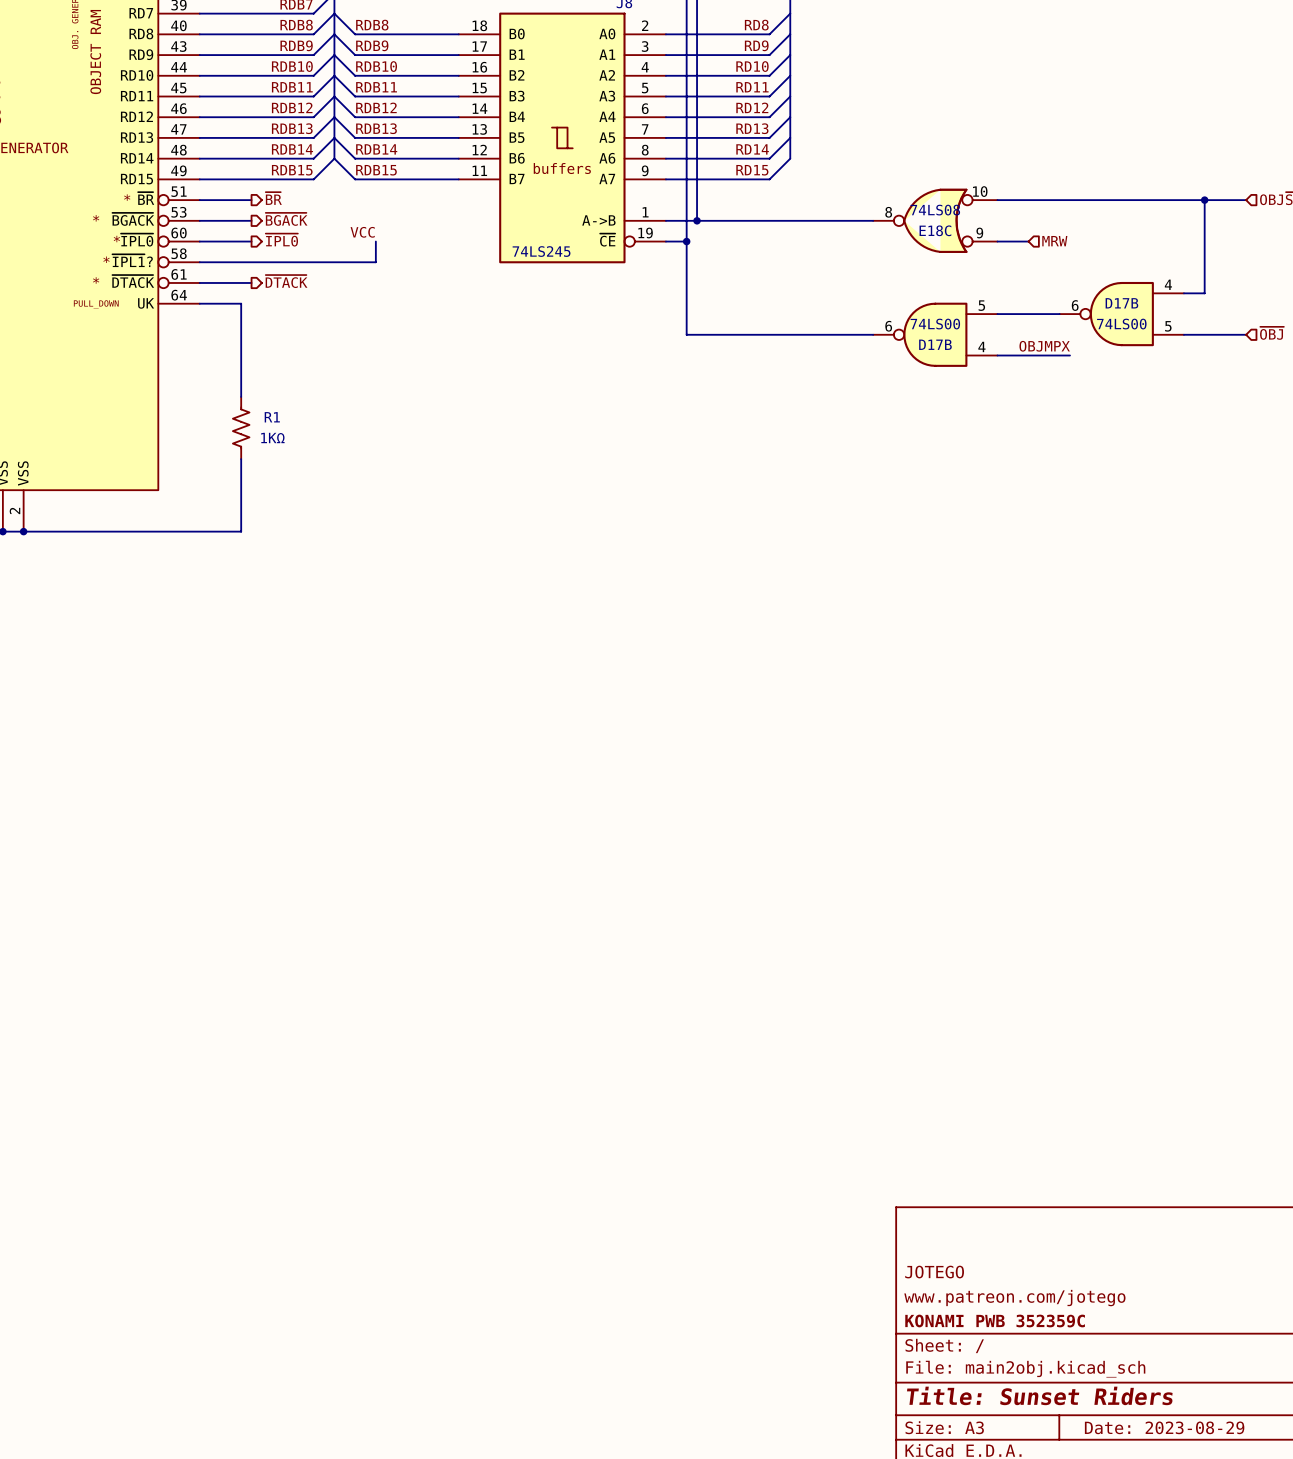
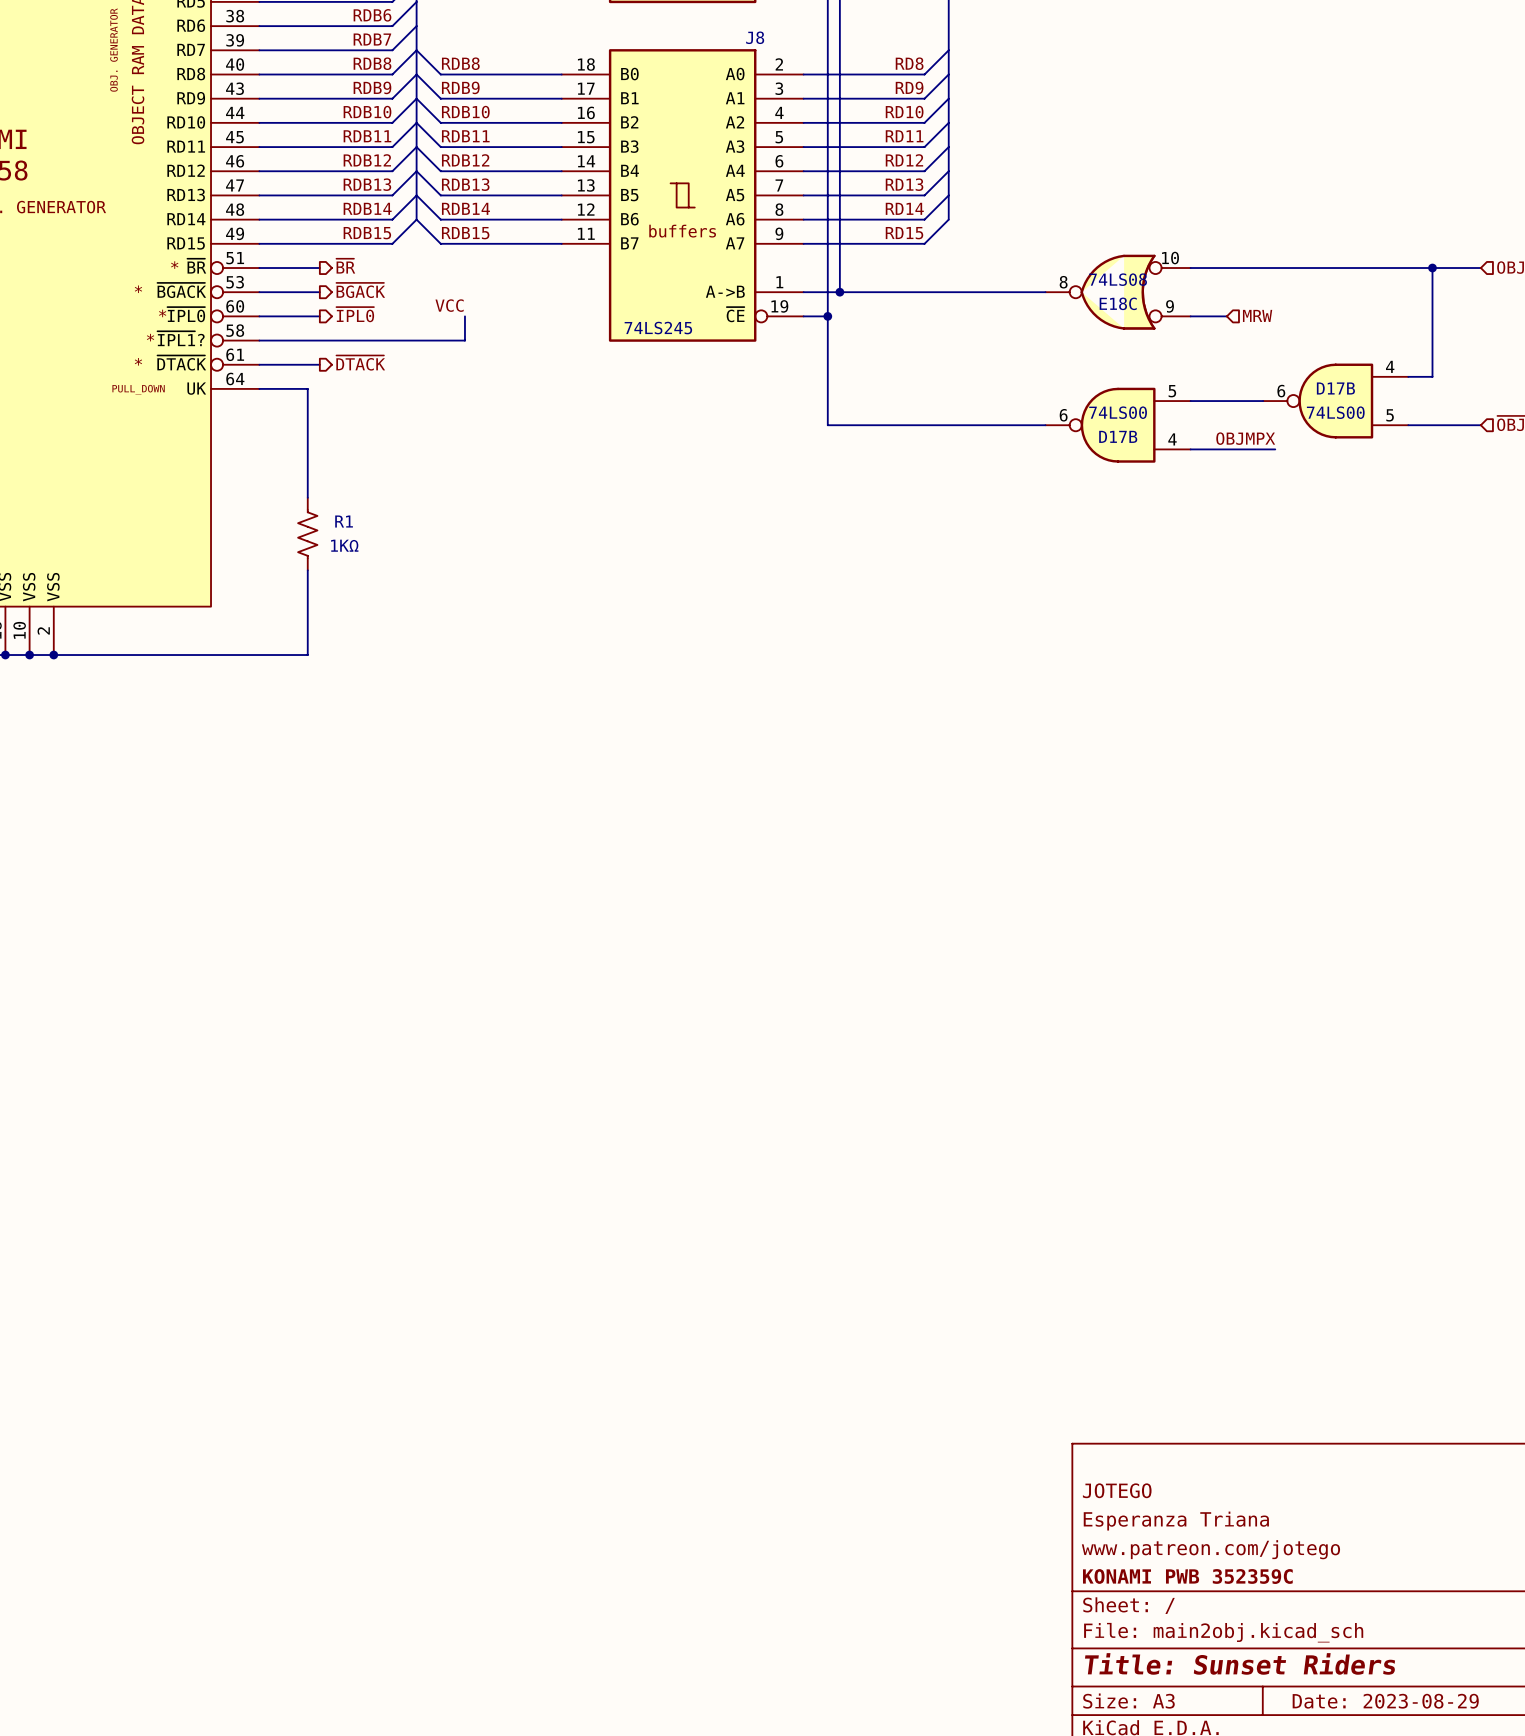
title block: none -> JOTEGO (1117, 1490)
title block: JOTEGO (934, 1272) -> Esperanza Triana (1176, 1521)

